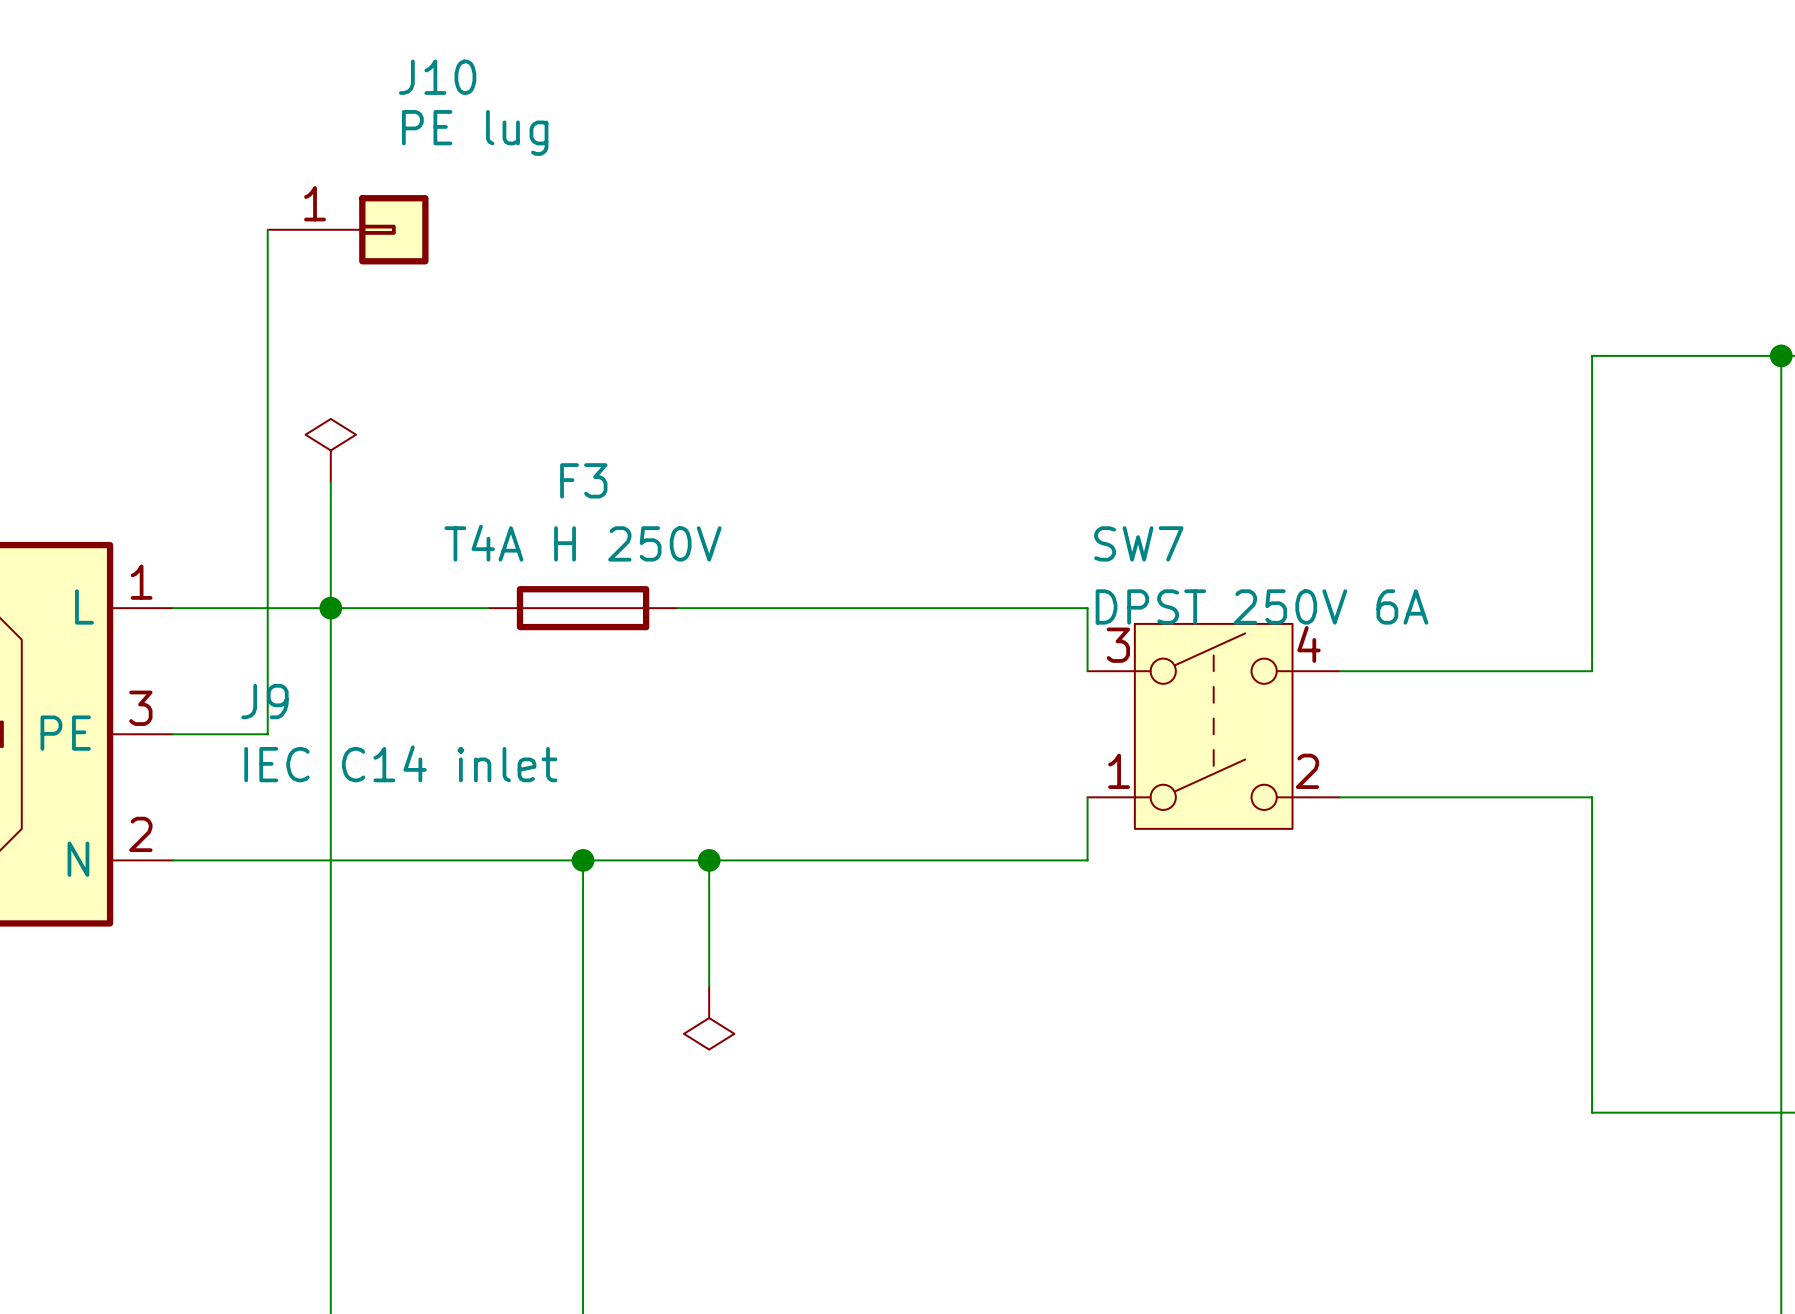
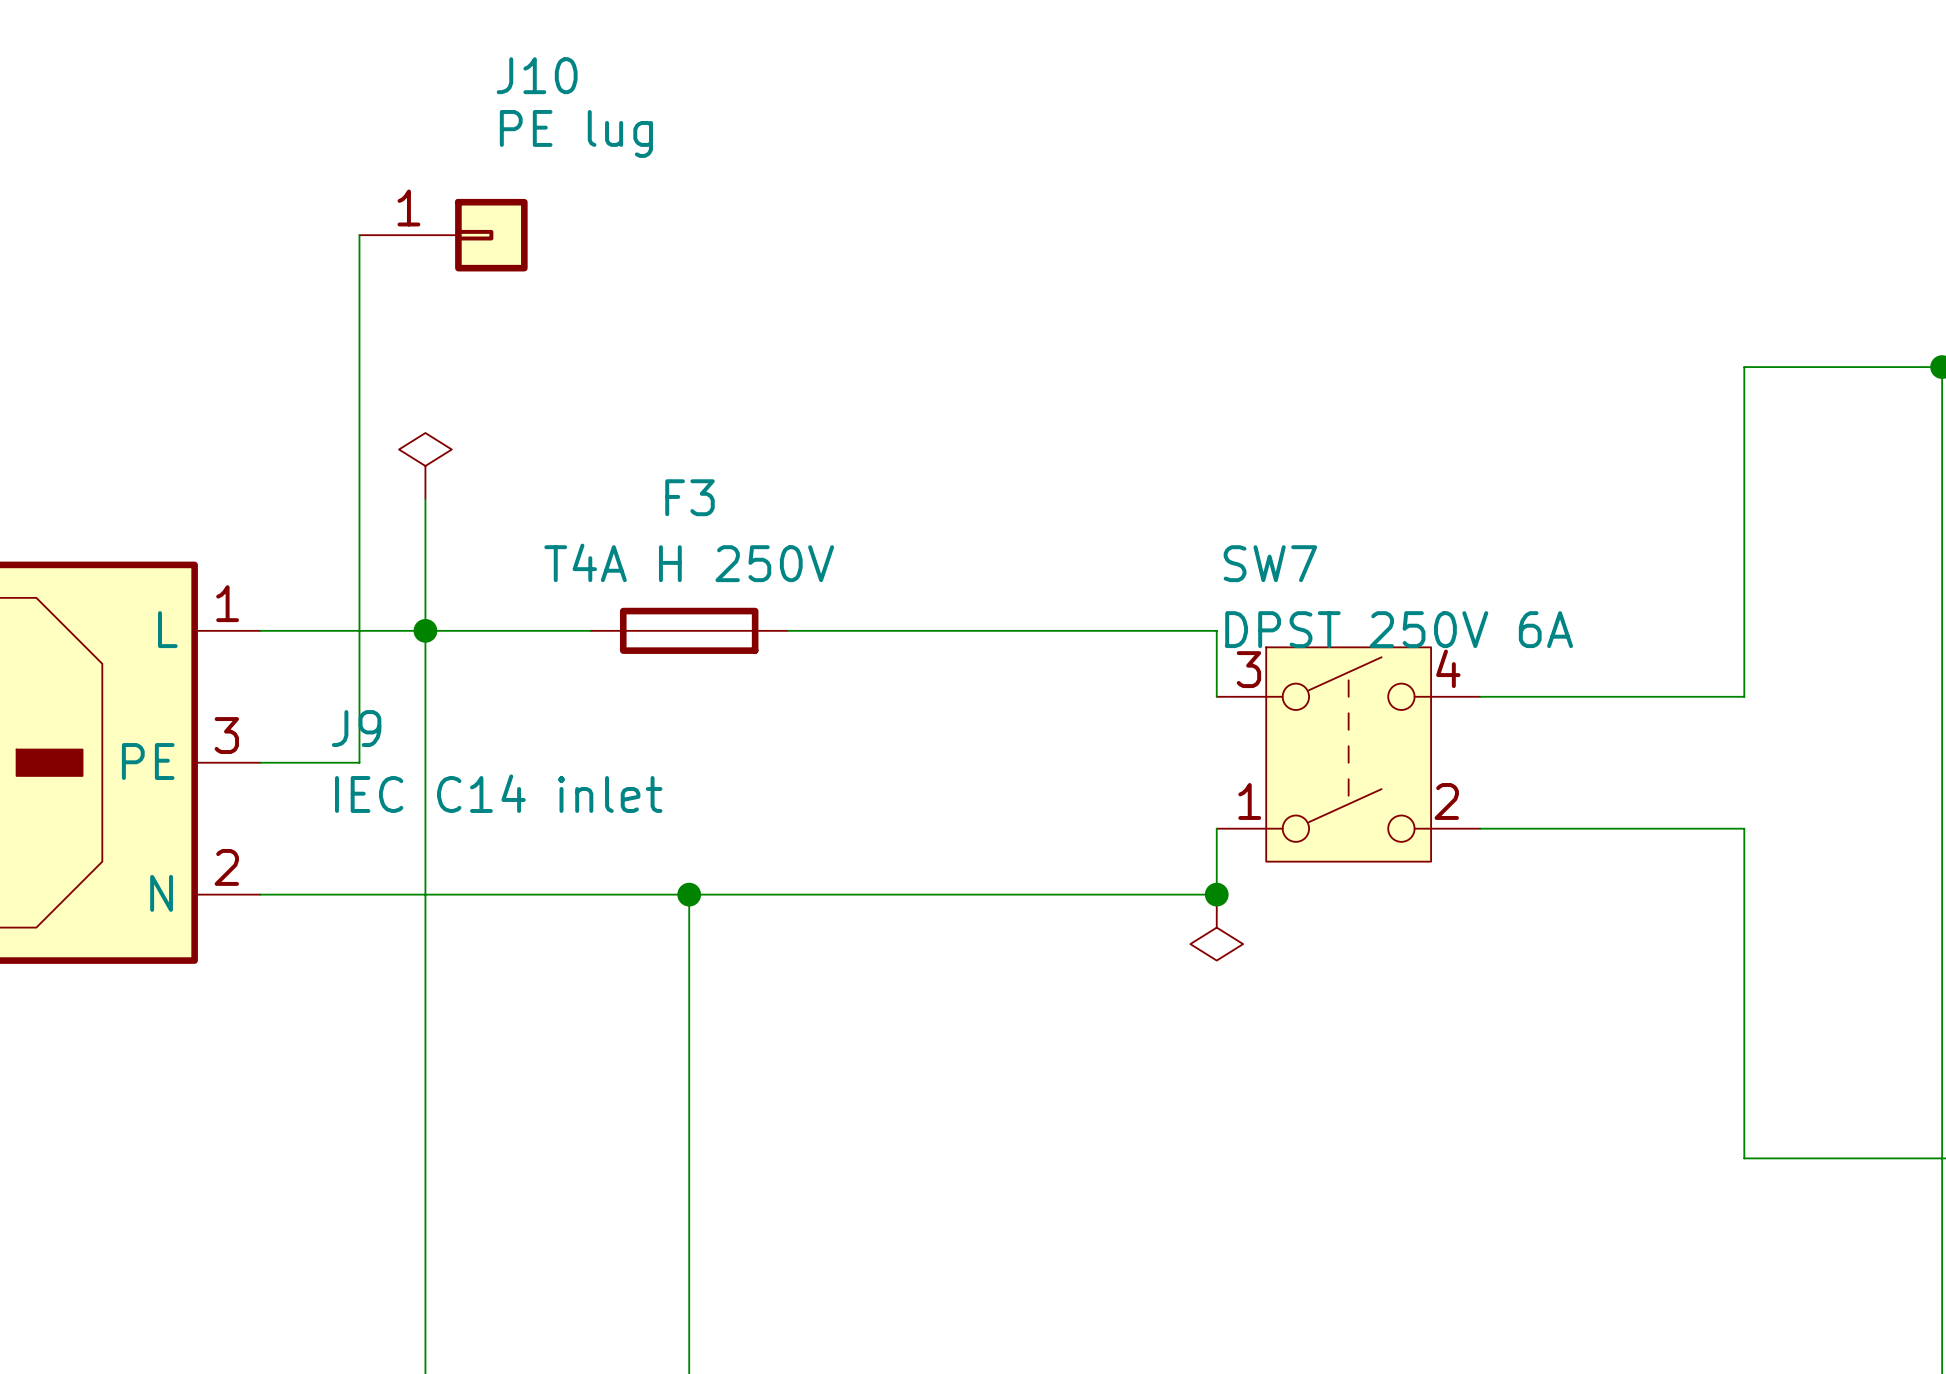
wire: (709, 860) (709, 986) -> none
junction: (709, 860) -> none
junction: none -> (1216, 894)
power symbol position: (709, 1018) -> (1216, 927)

